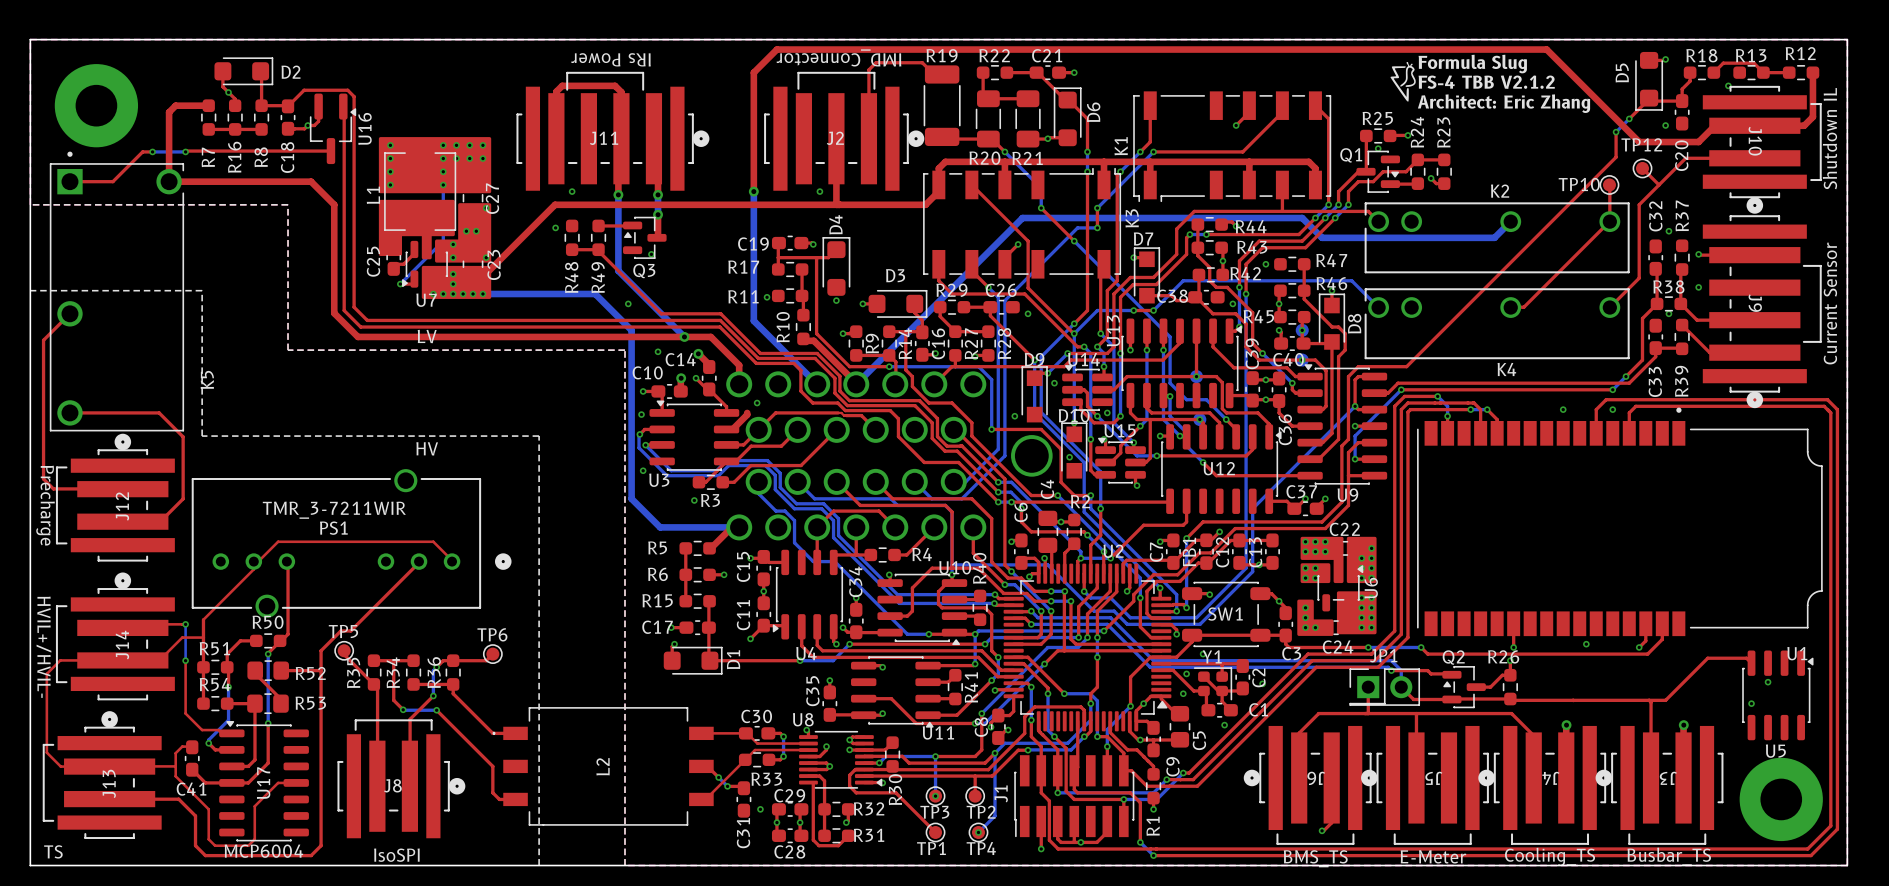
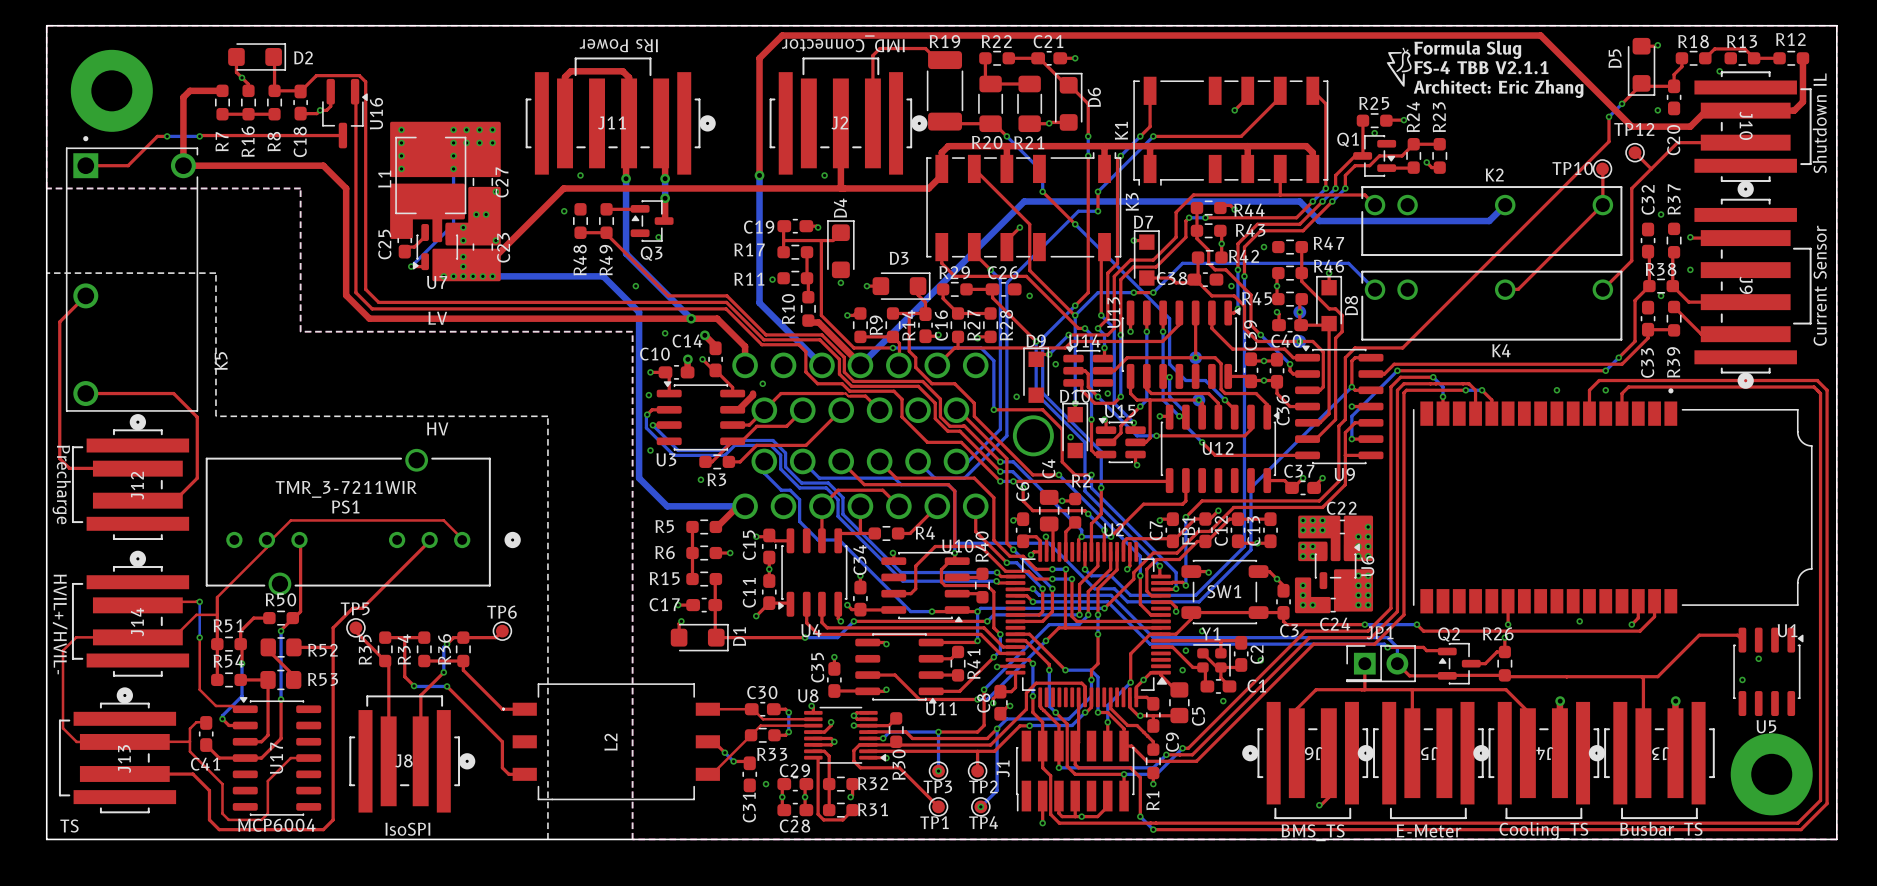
drawing shape: [1390, 54, 1591, 113] -> [1386, 40, 1584, 99]

